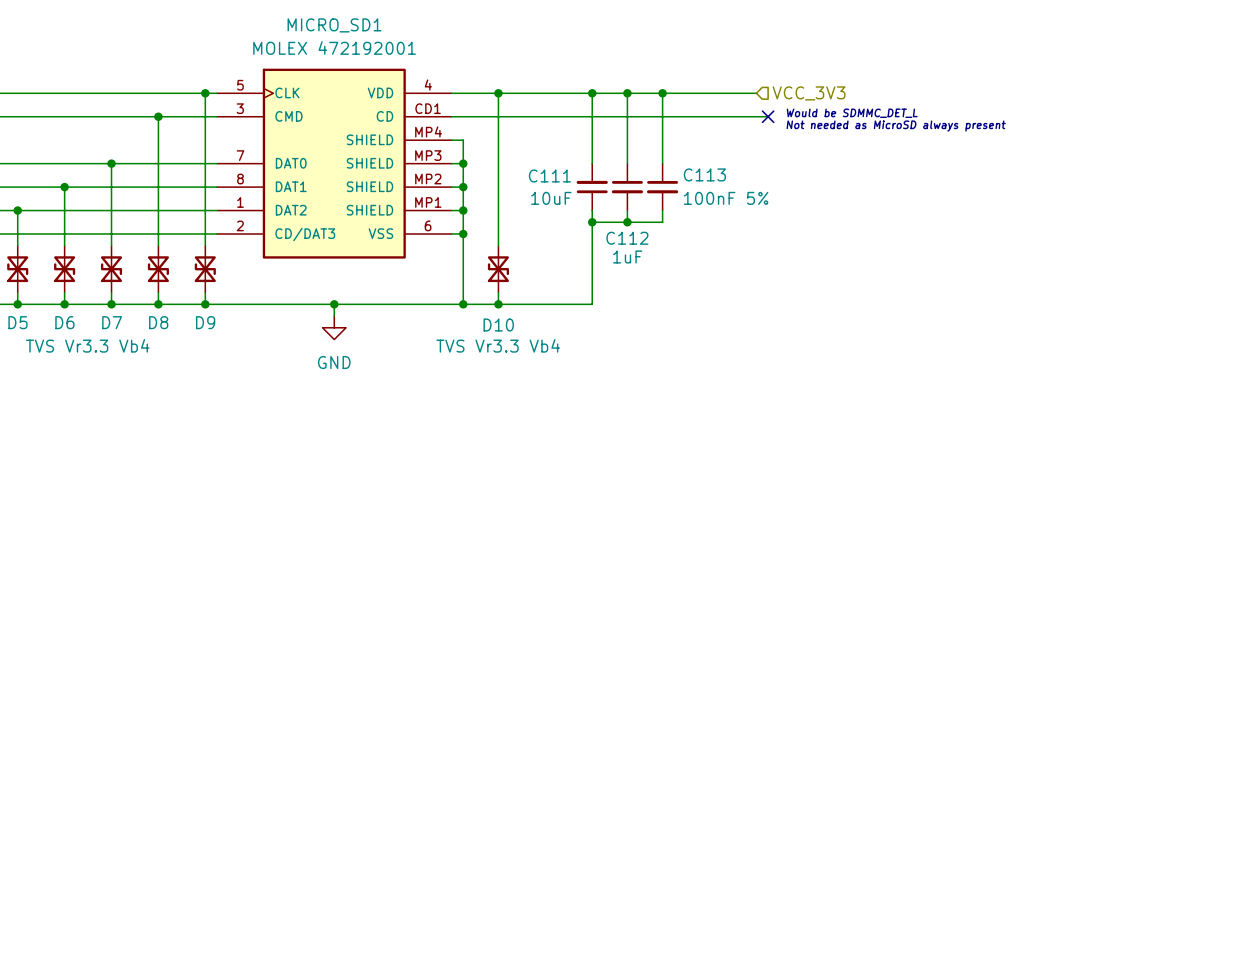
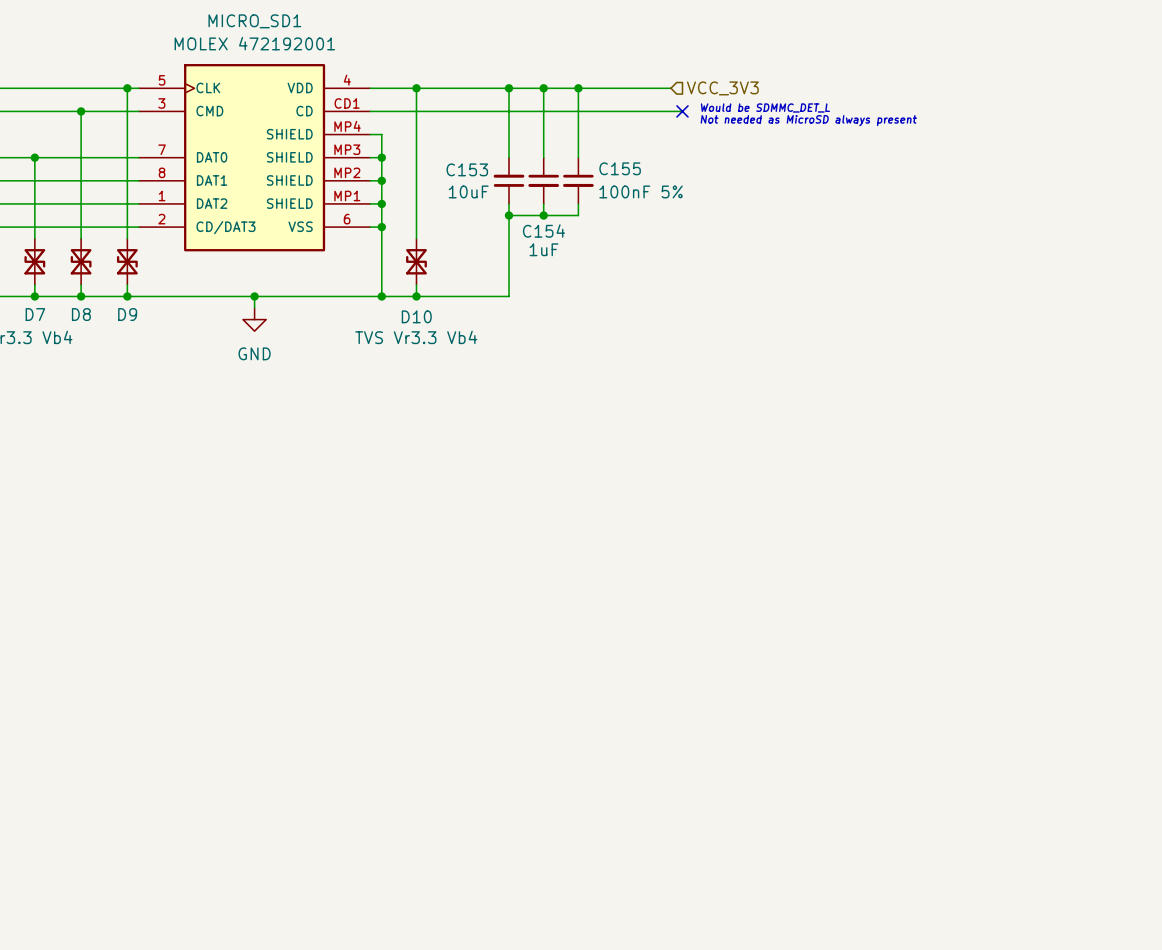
C113 name: C113 (704, 174) -> C155 (620, 168)
C111 name: C111 (549, 175) -> C153 (467, 169)
C112 name: C112 (627, 238) -> C154 (543, 230)

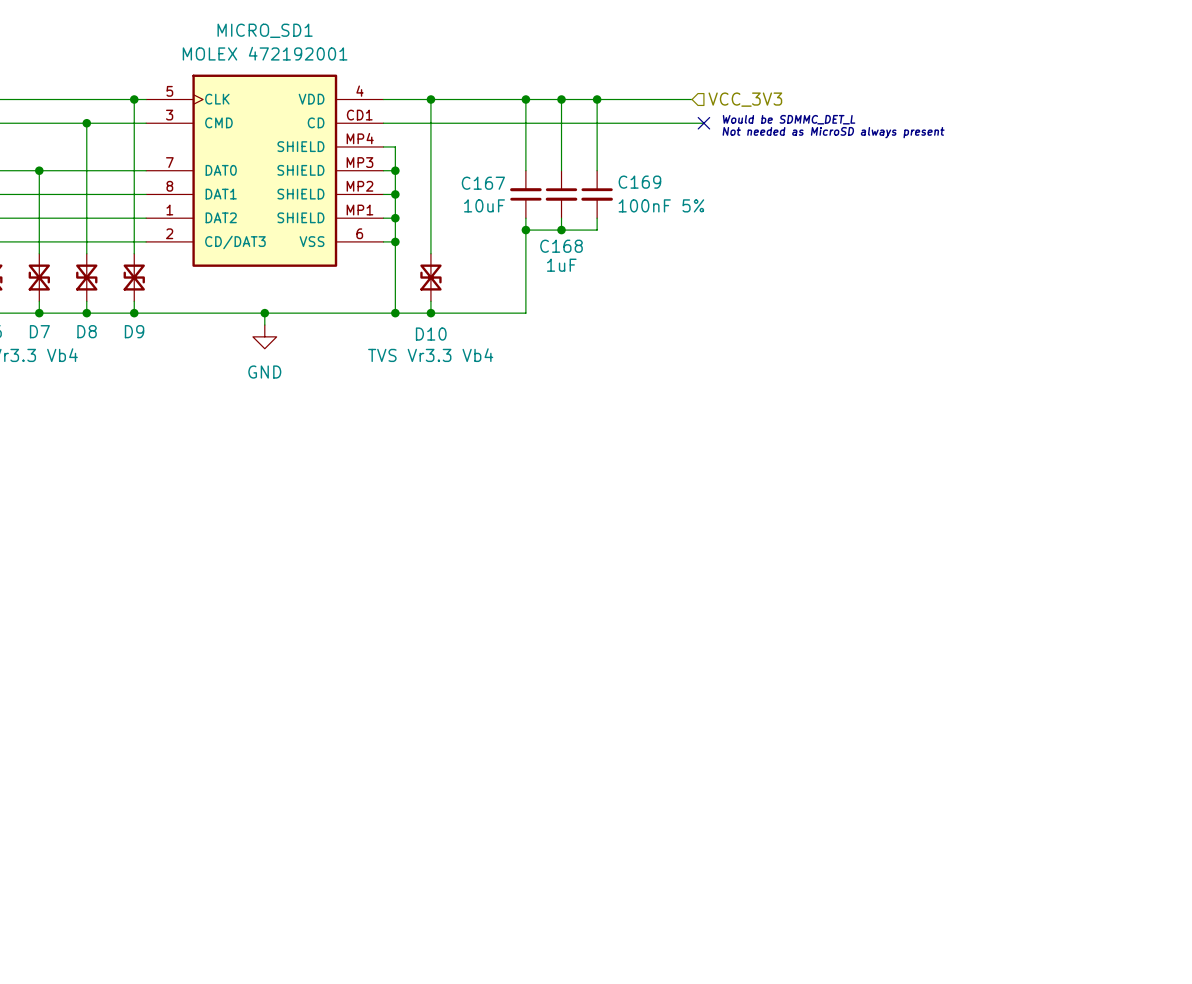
C155 name: C155 (620, 168) -> C169 (639, 182)
C153 name: C153 (467, 169) -> C167 (483, 183)
C154 name: C154 (543, 230) -> C168 (561, 246)

